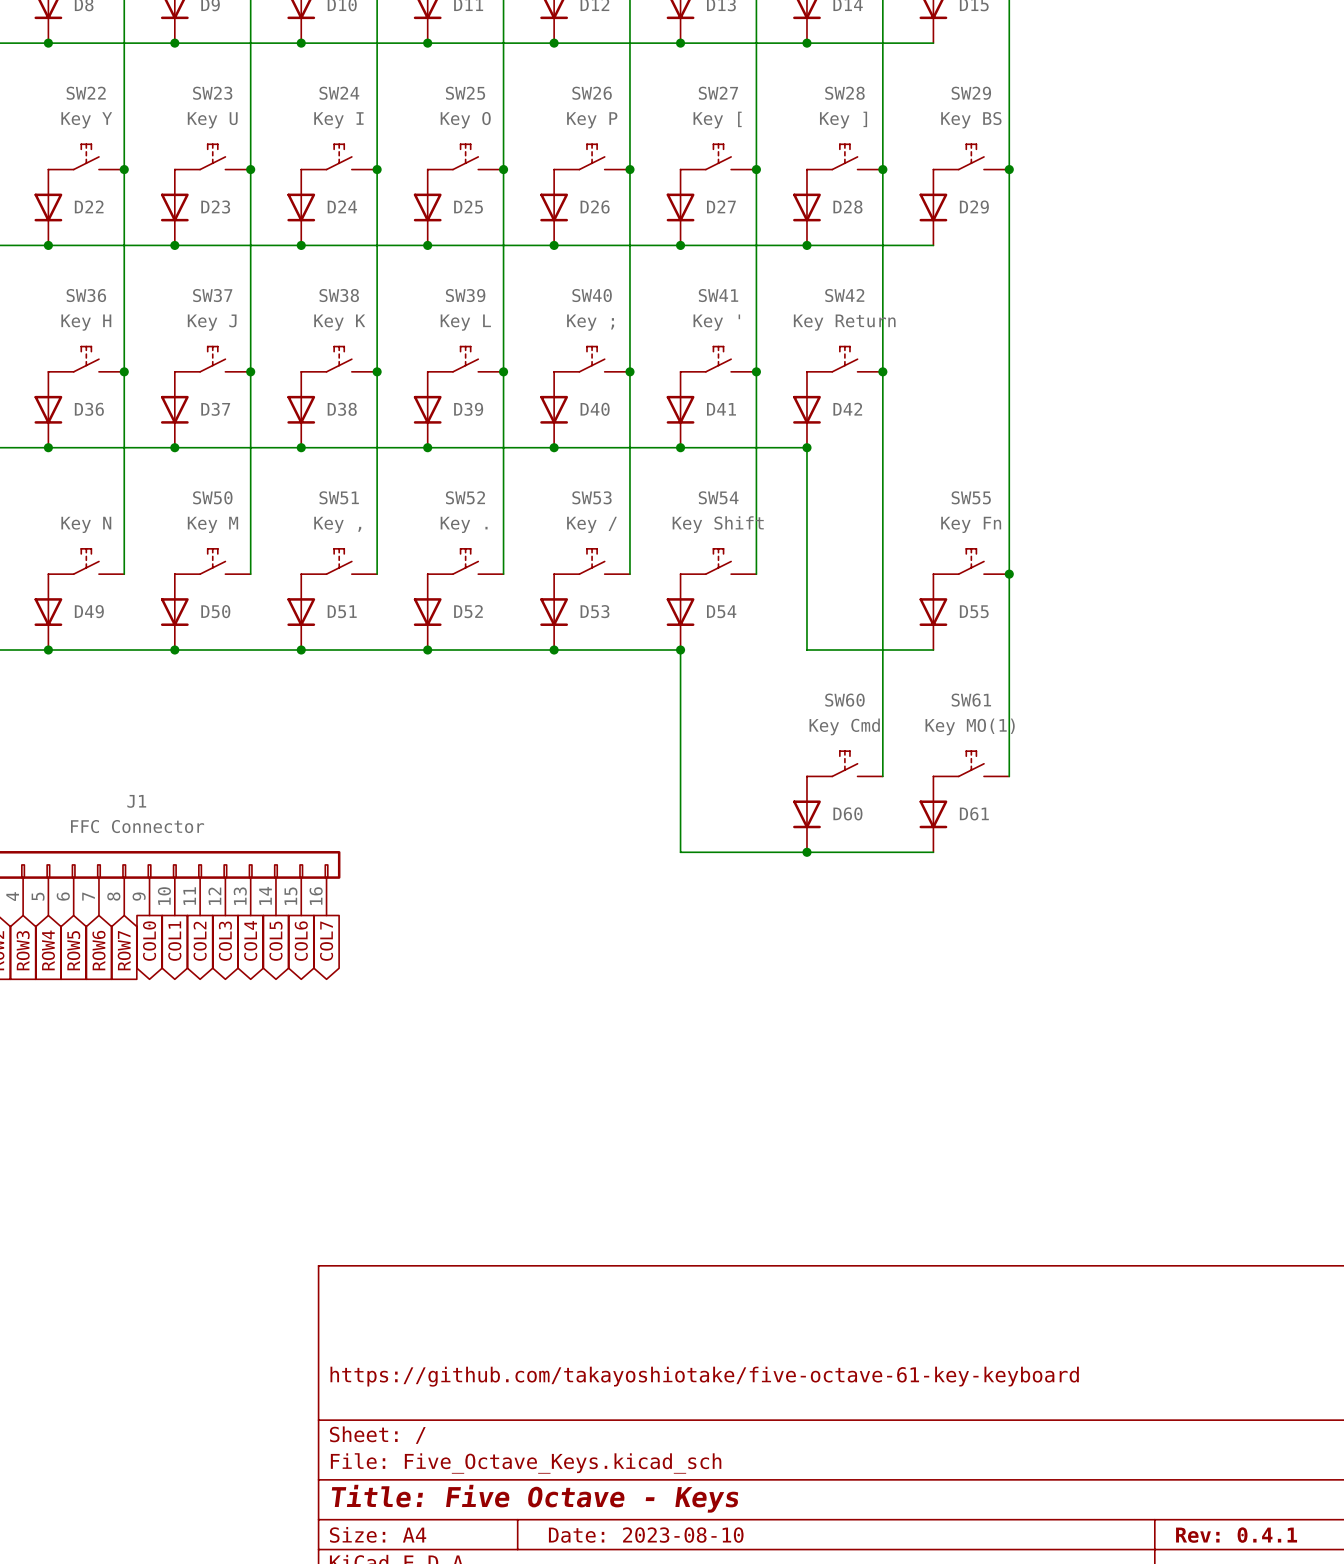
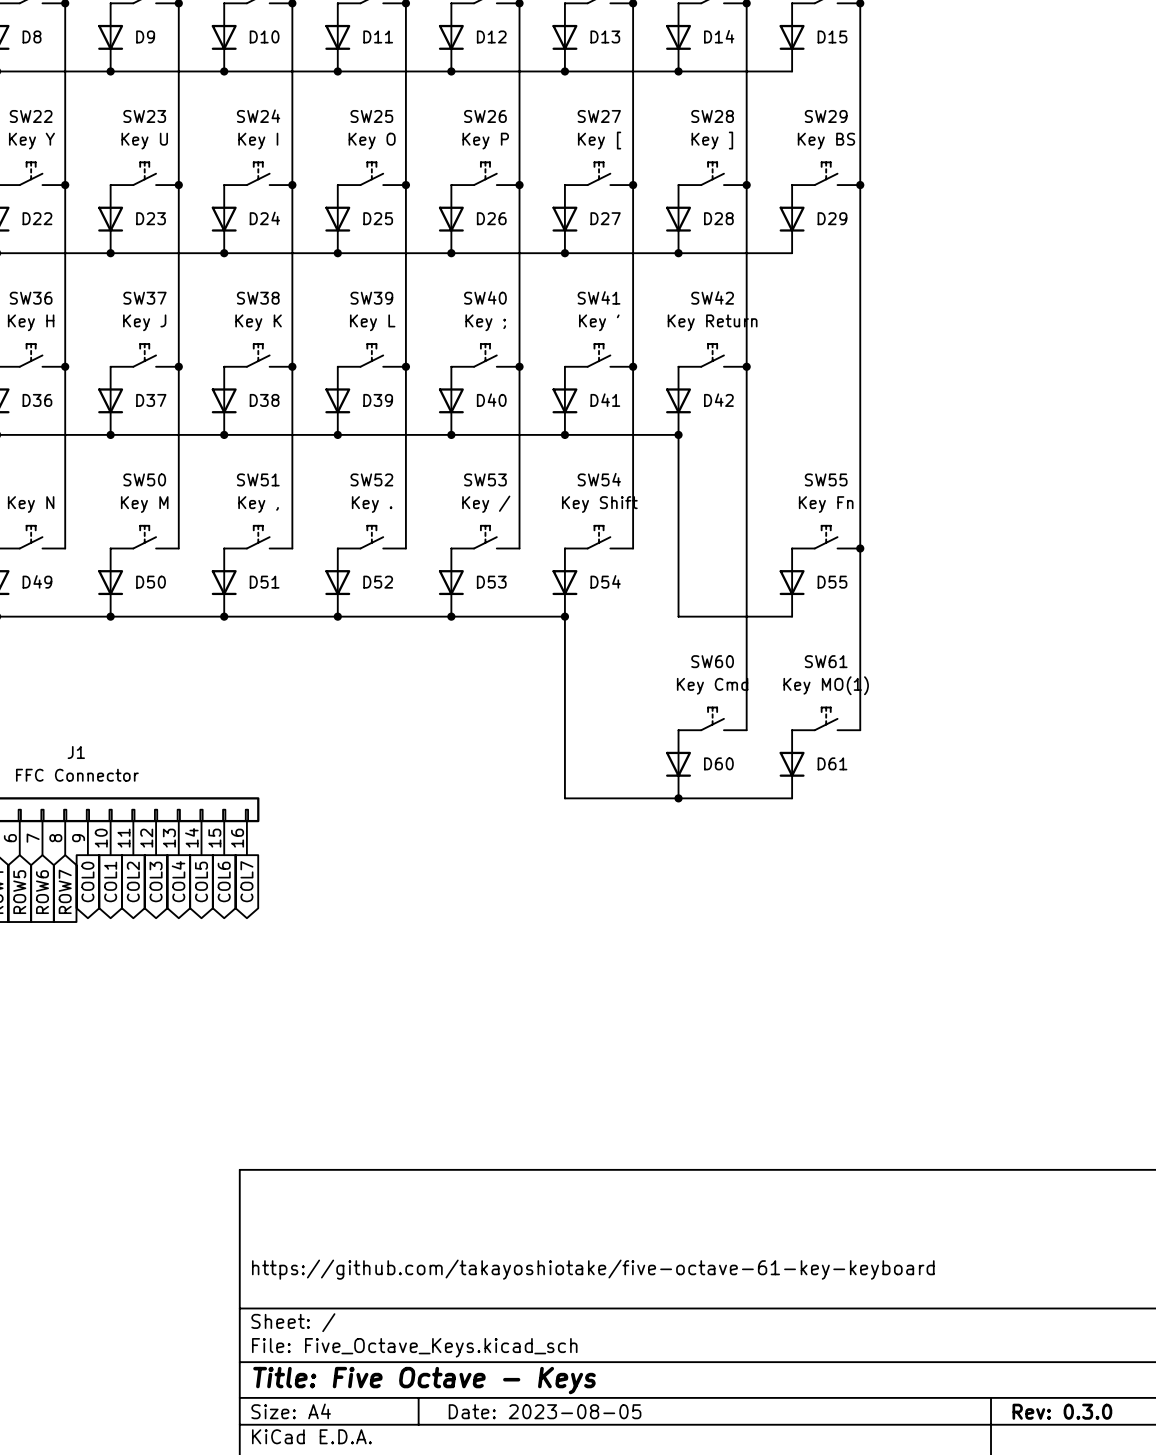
title block: Date: 2023-08-10 (646, 1535) -> Date: 2023-08-05 (545, 1411)
title block: Rev: 0.4.1 (1236, 1535) -> Rev: 0.3.0 (1062, 1411)

